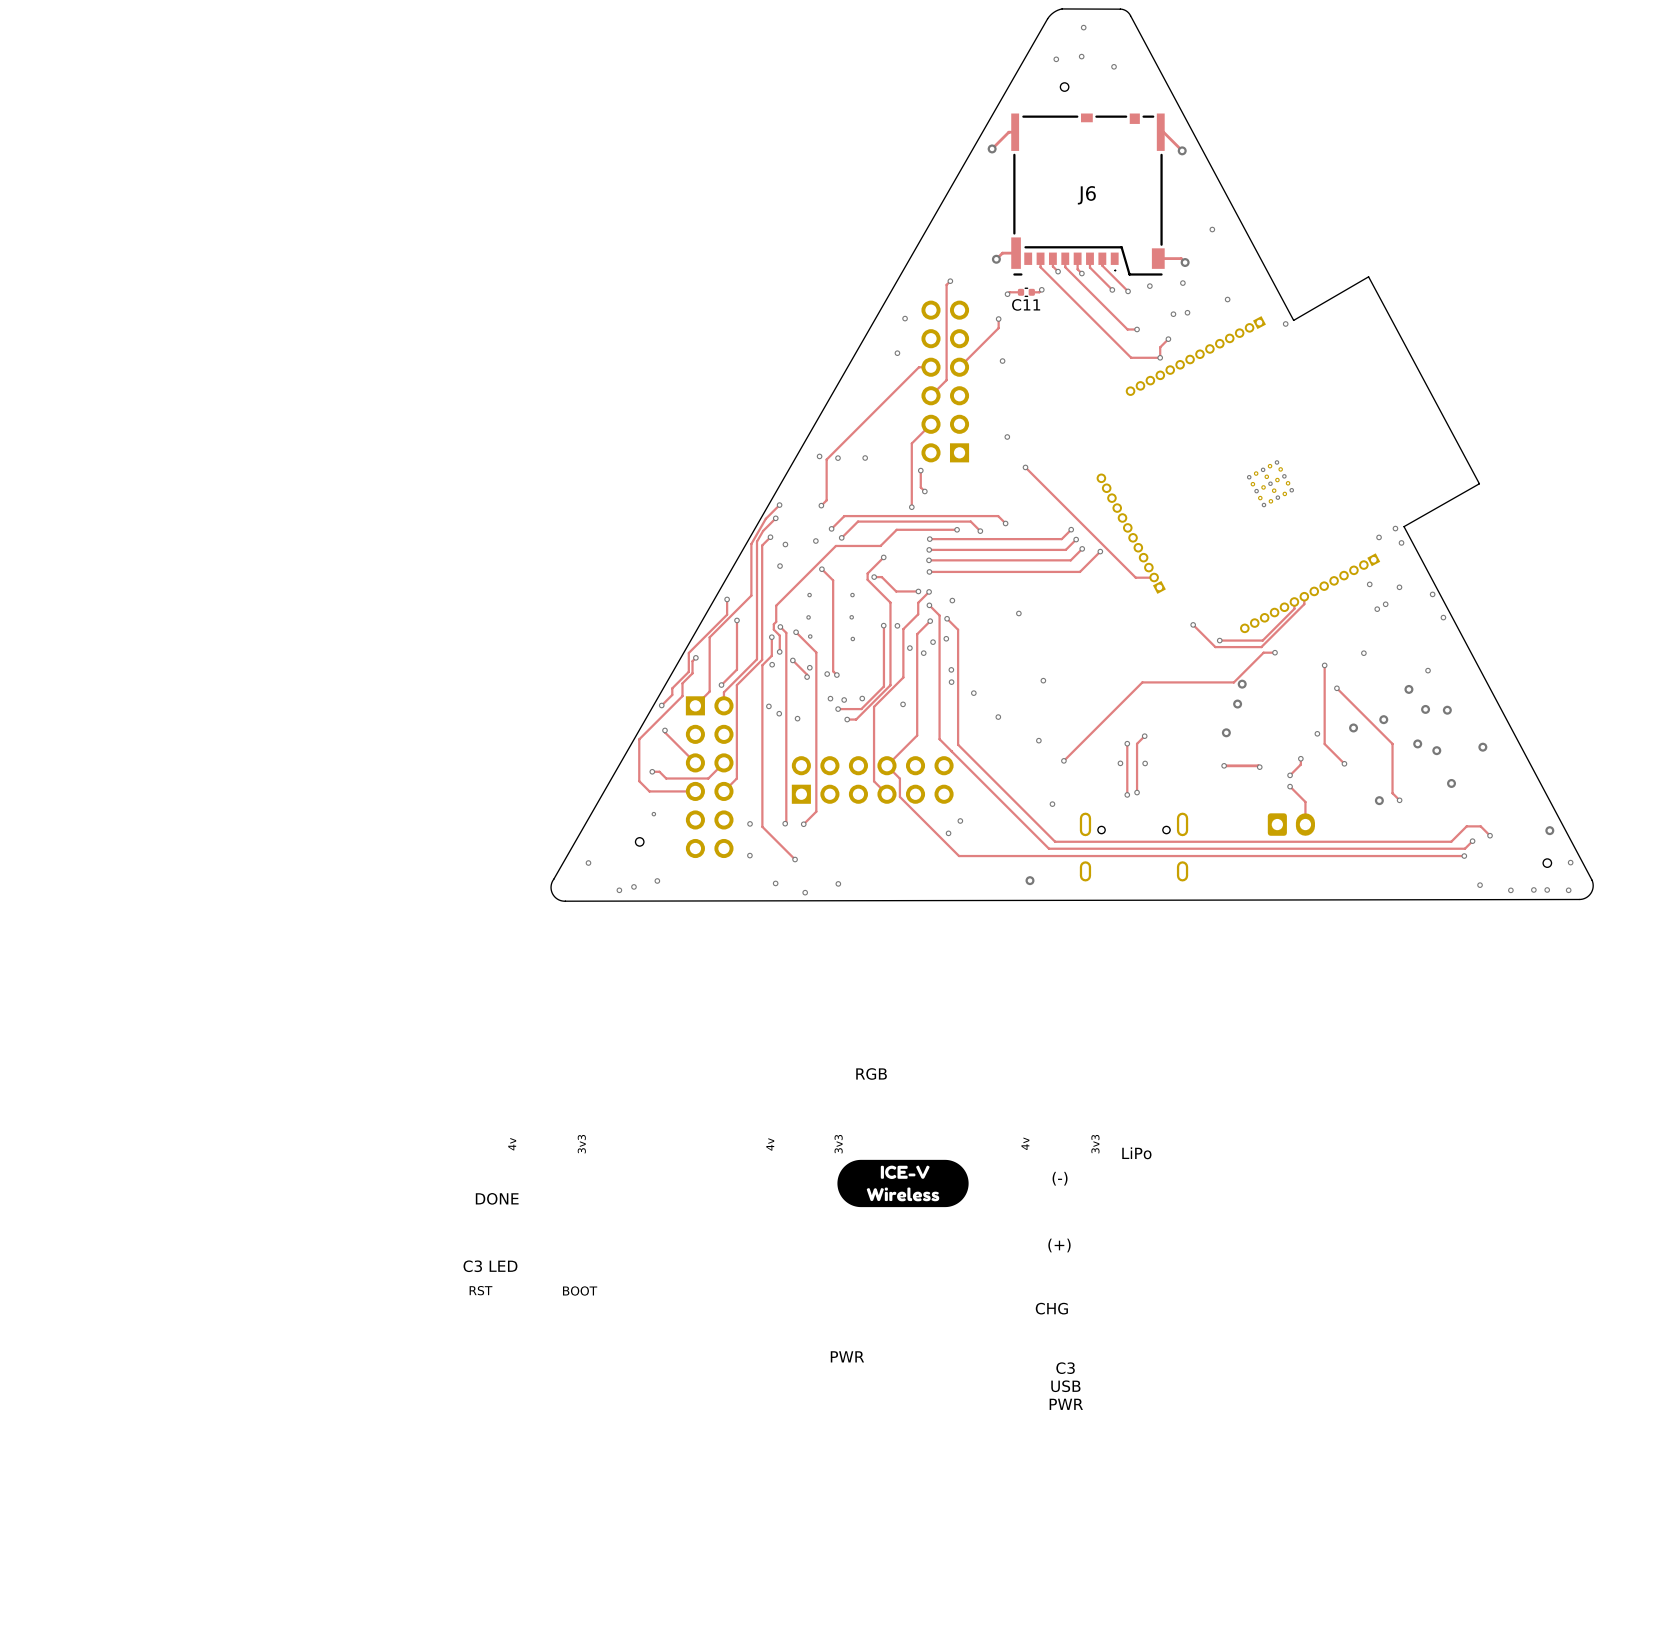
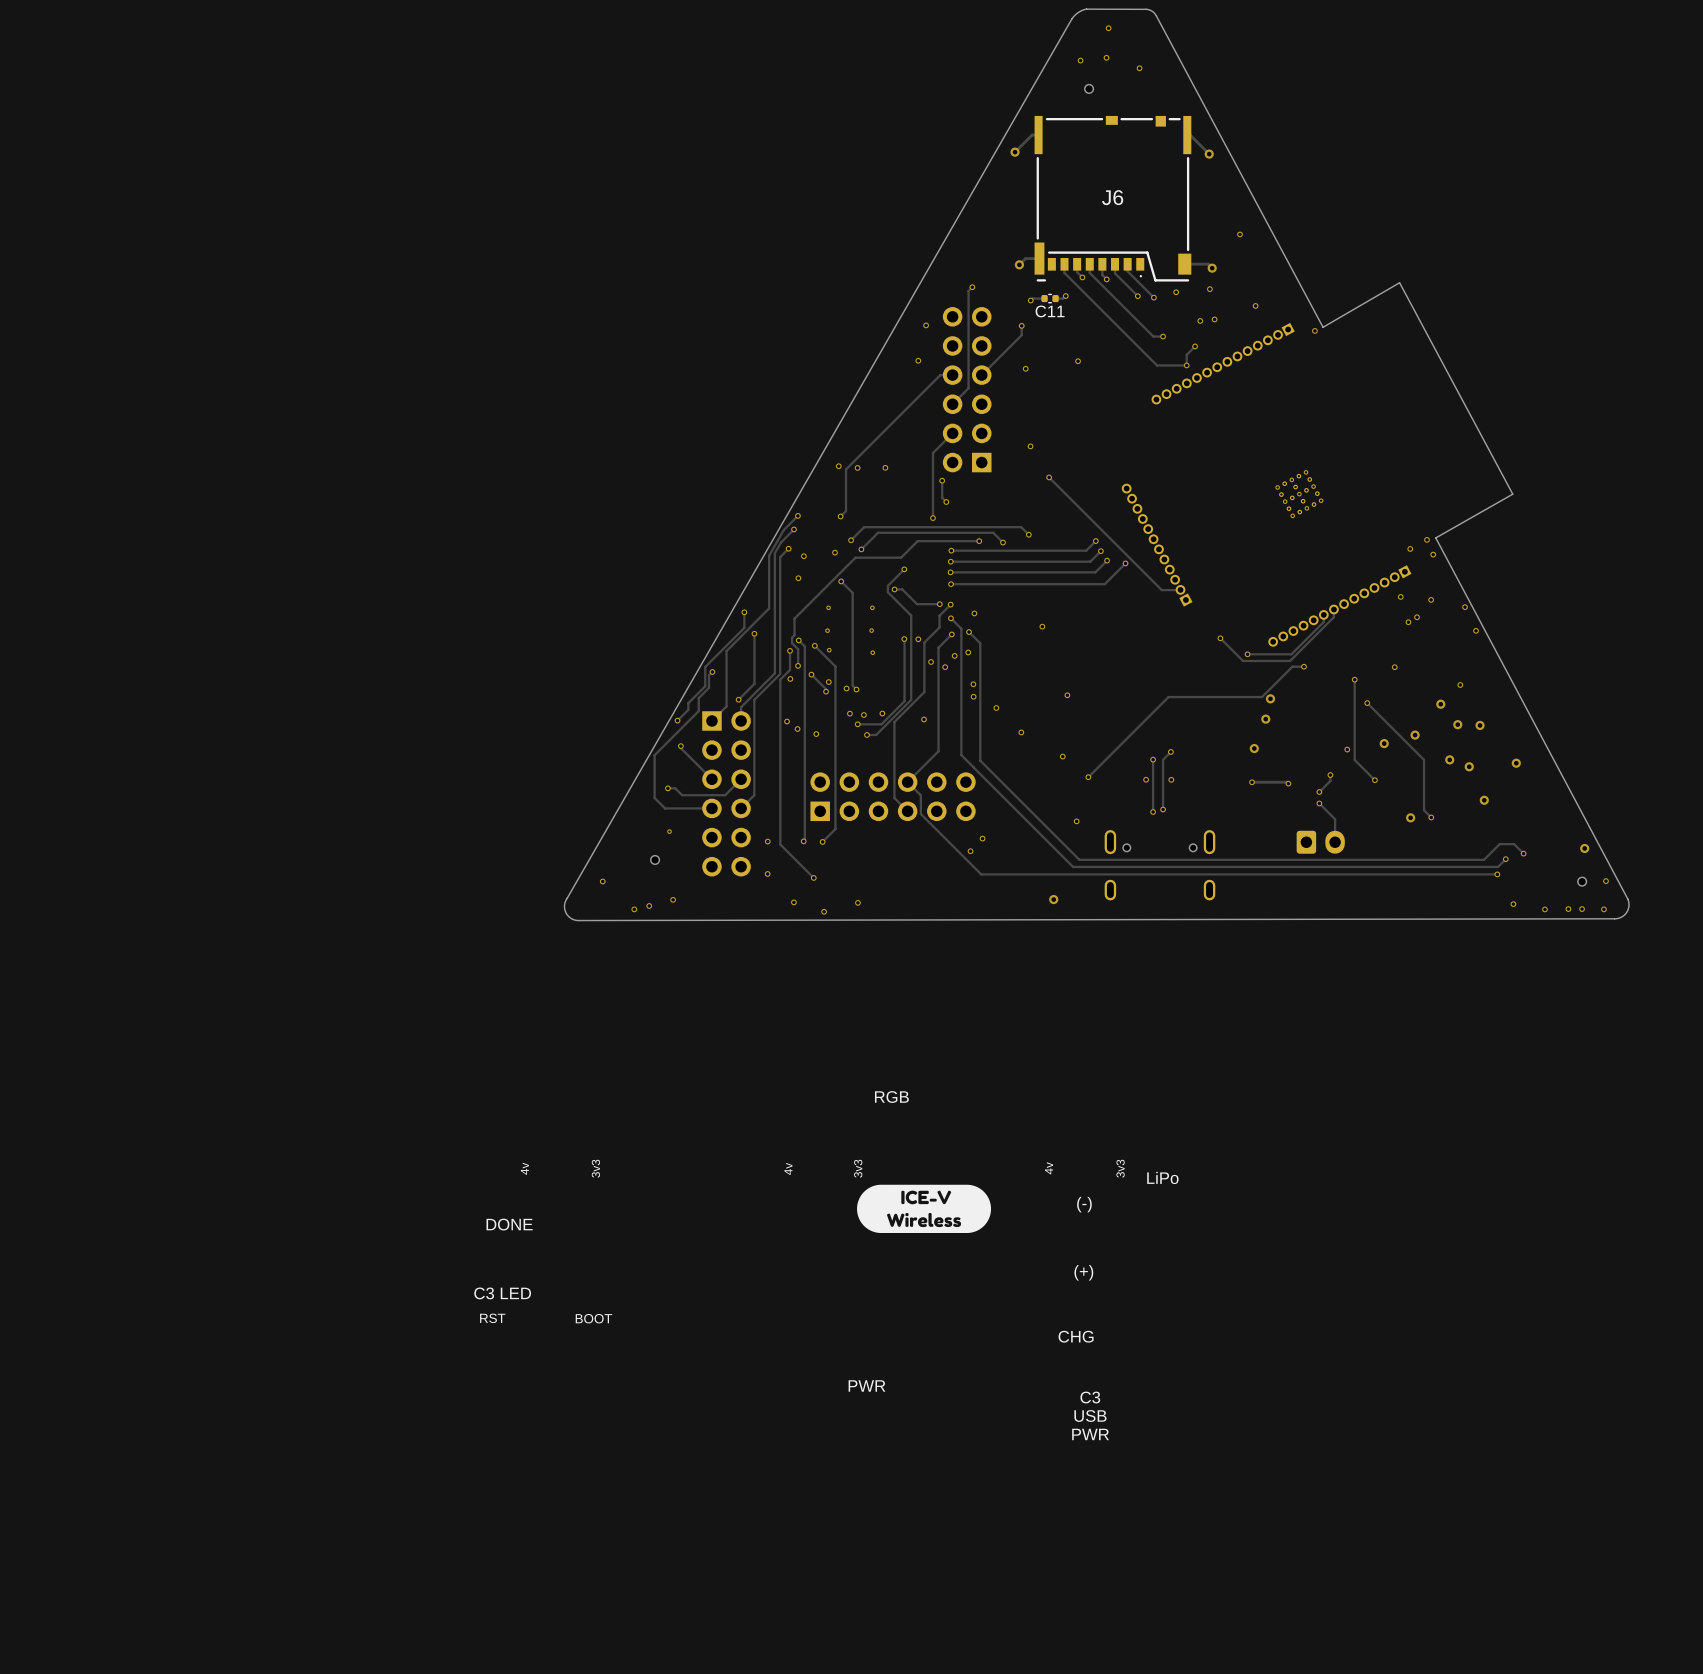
via: none -> (1078, 361)

